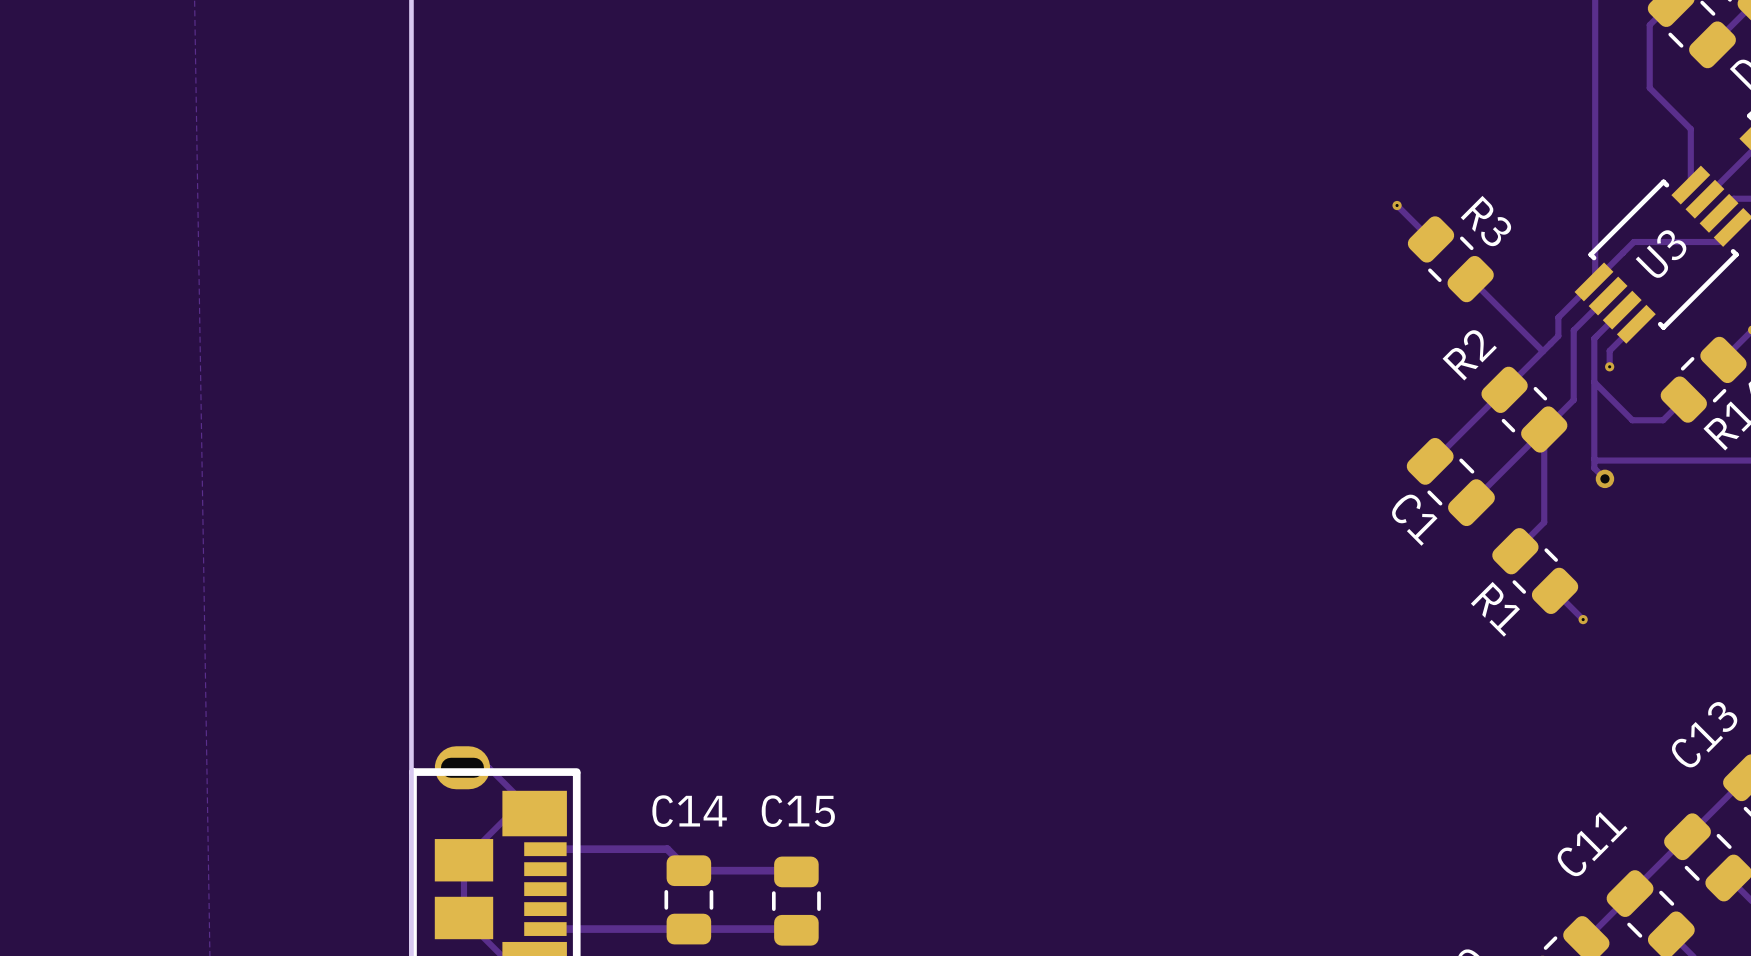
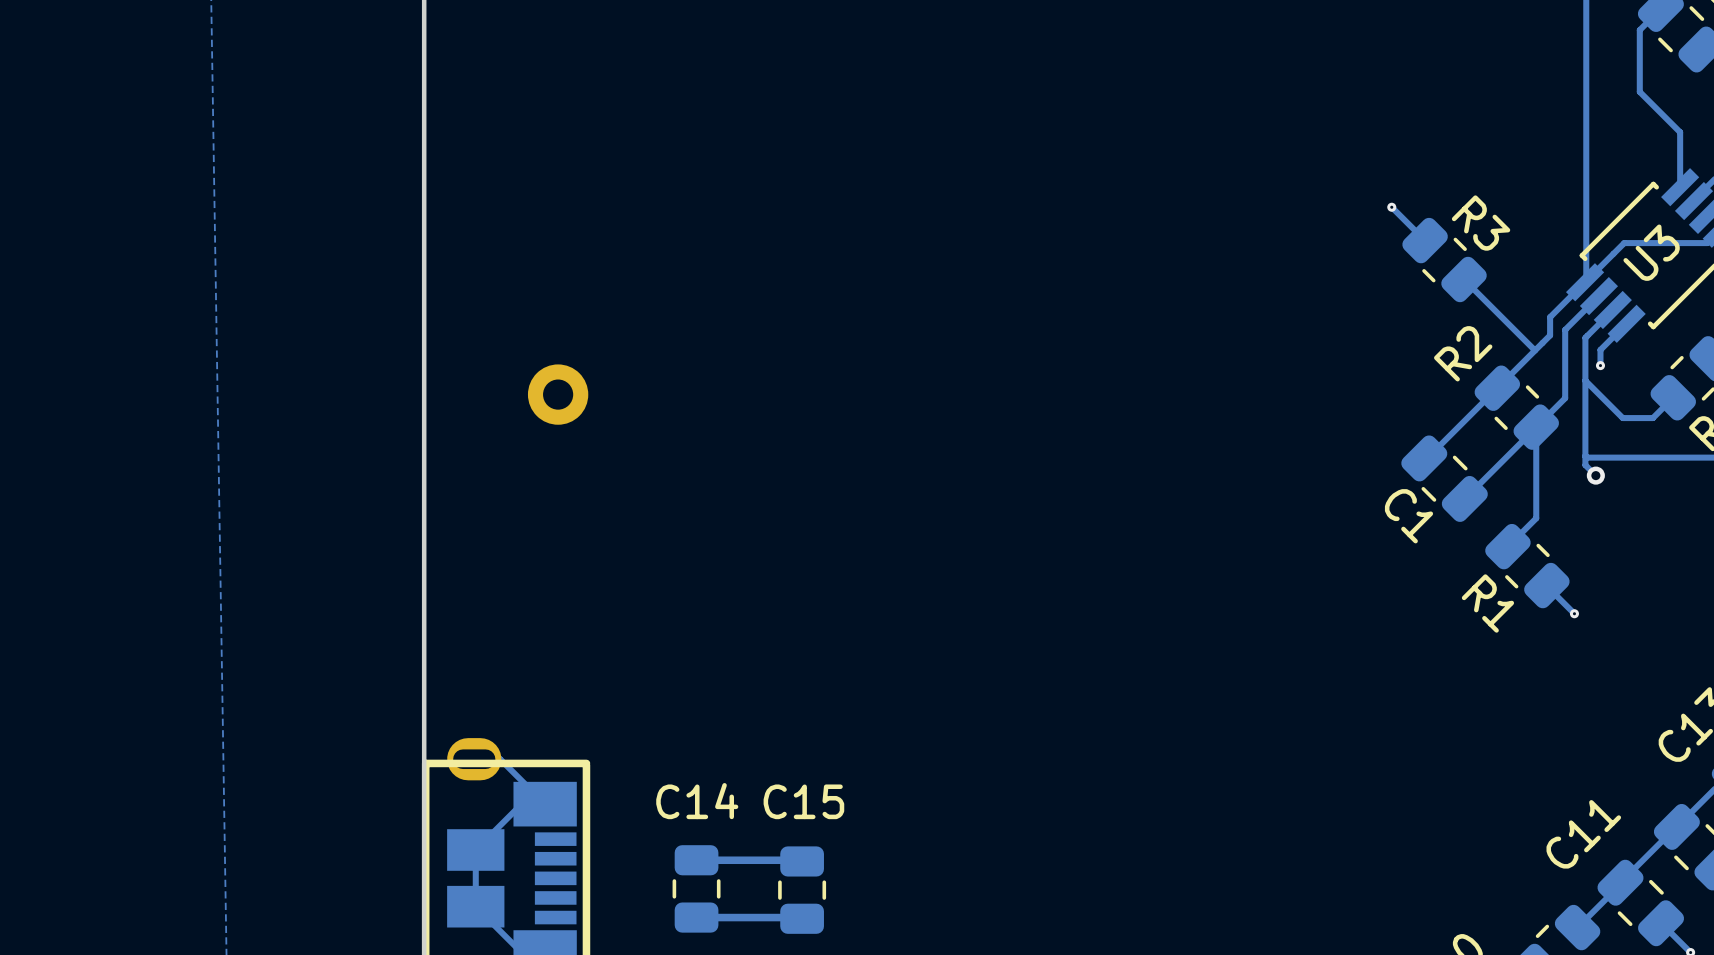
part: none -> (558, 394)
track: (545, 849) (667, 849) (688, 870) -> none
track: (688, 929) (545, 929) -> none

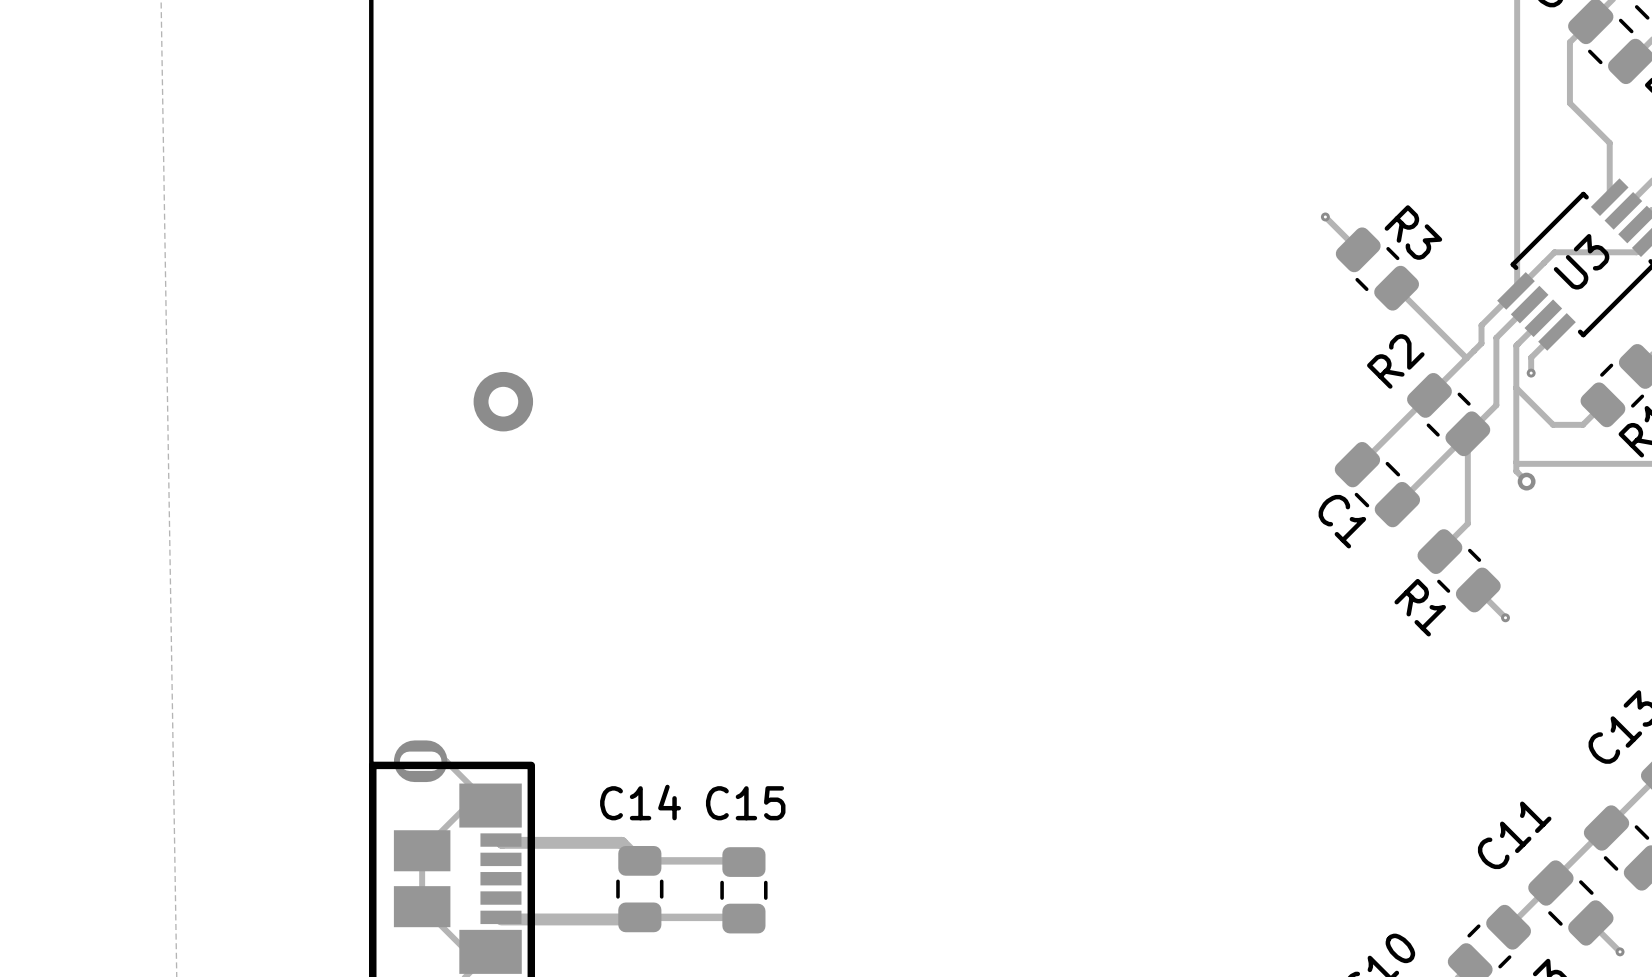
track: none -> (501, 842) (621, 842) (639, 860)
track: none -> (639, 917) (637, 919) (501, 919)

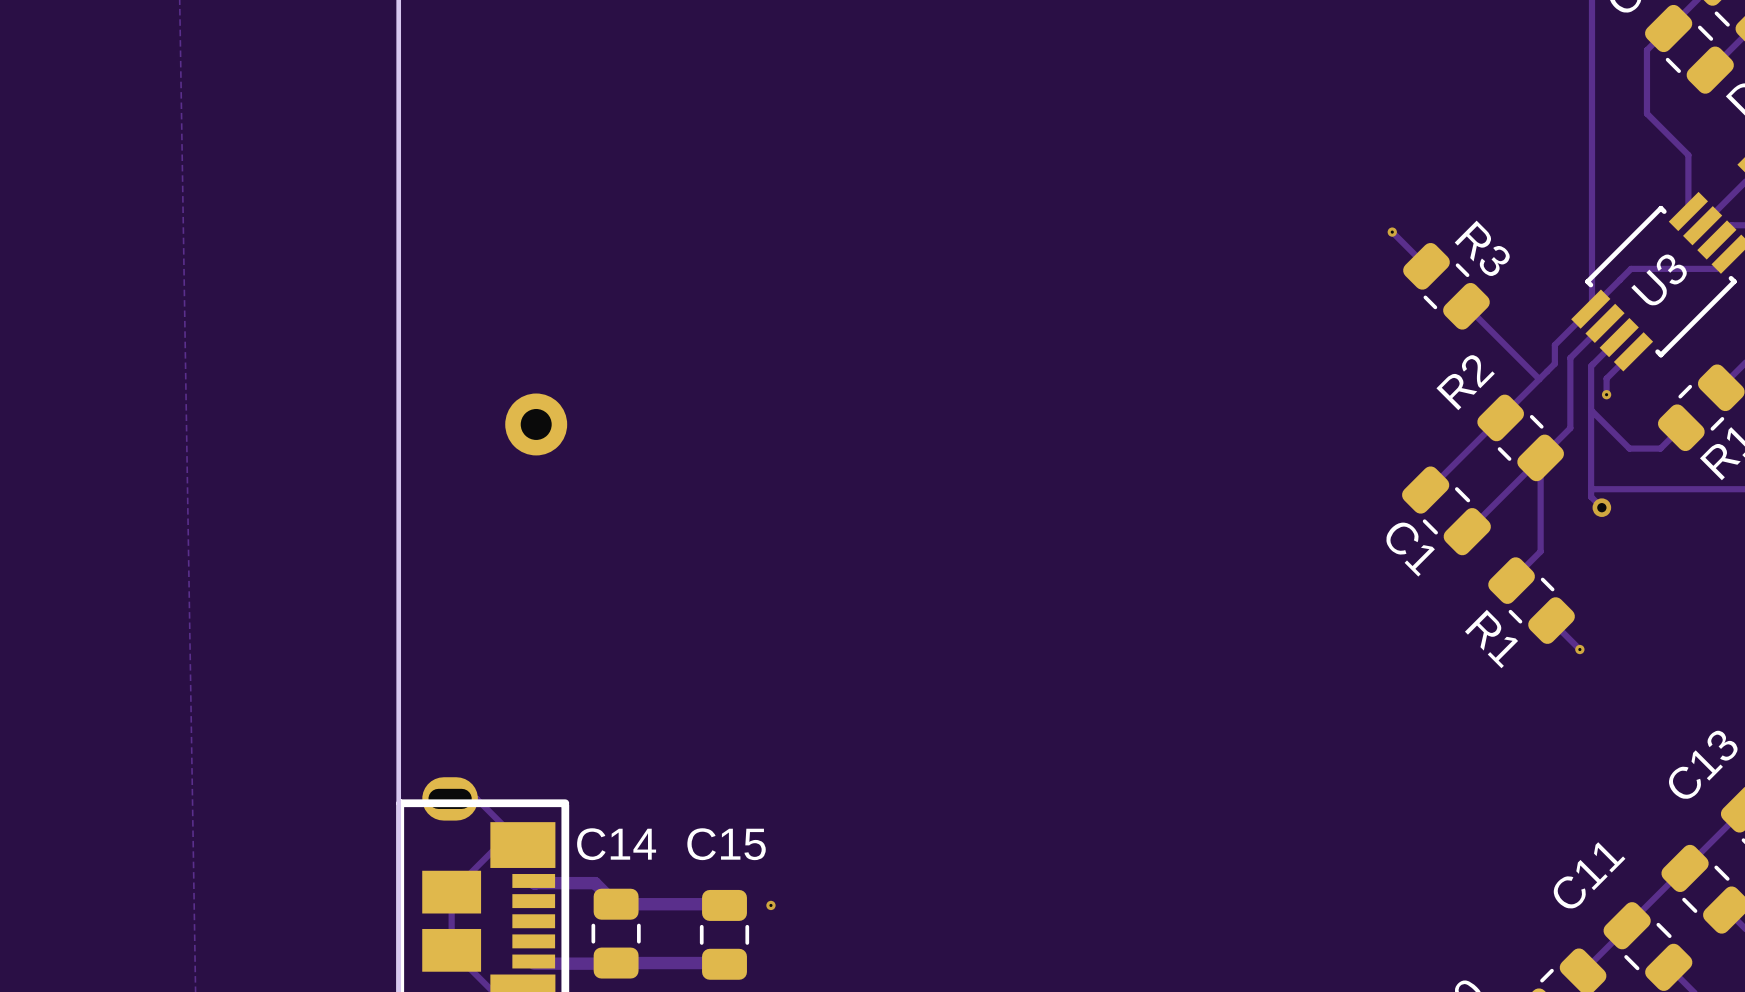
track: (501, 842) (621, 842) (639, 860) (743, 862) -> (534, 883) (595, 883) (616, 904) (723, 904)
via: none -> (770, 905)
C14 position: (639, 889) -> (616, 933)
C15 position: (743, 890) -> (724, 934)
track: (743, 918) (639, 917) (637, 919) (579, 919) -> (724, 964) (616, 963)

